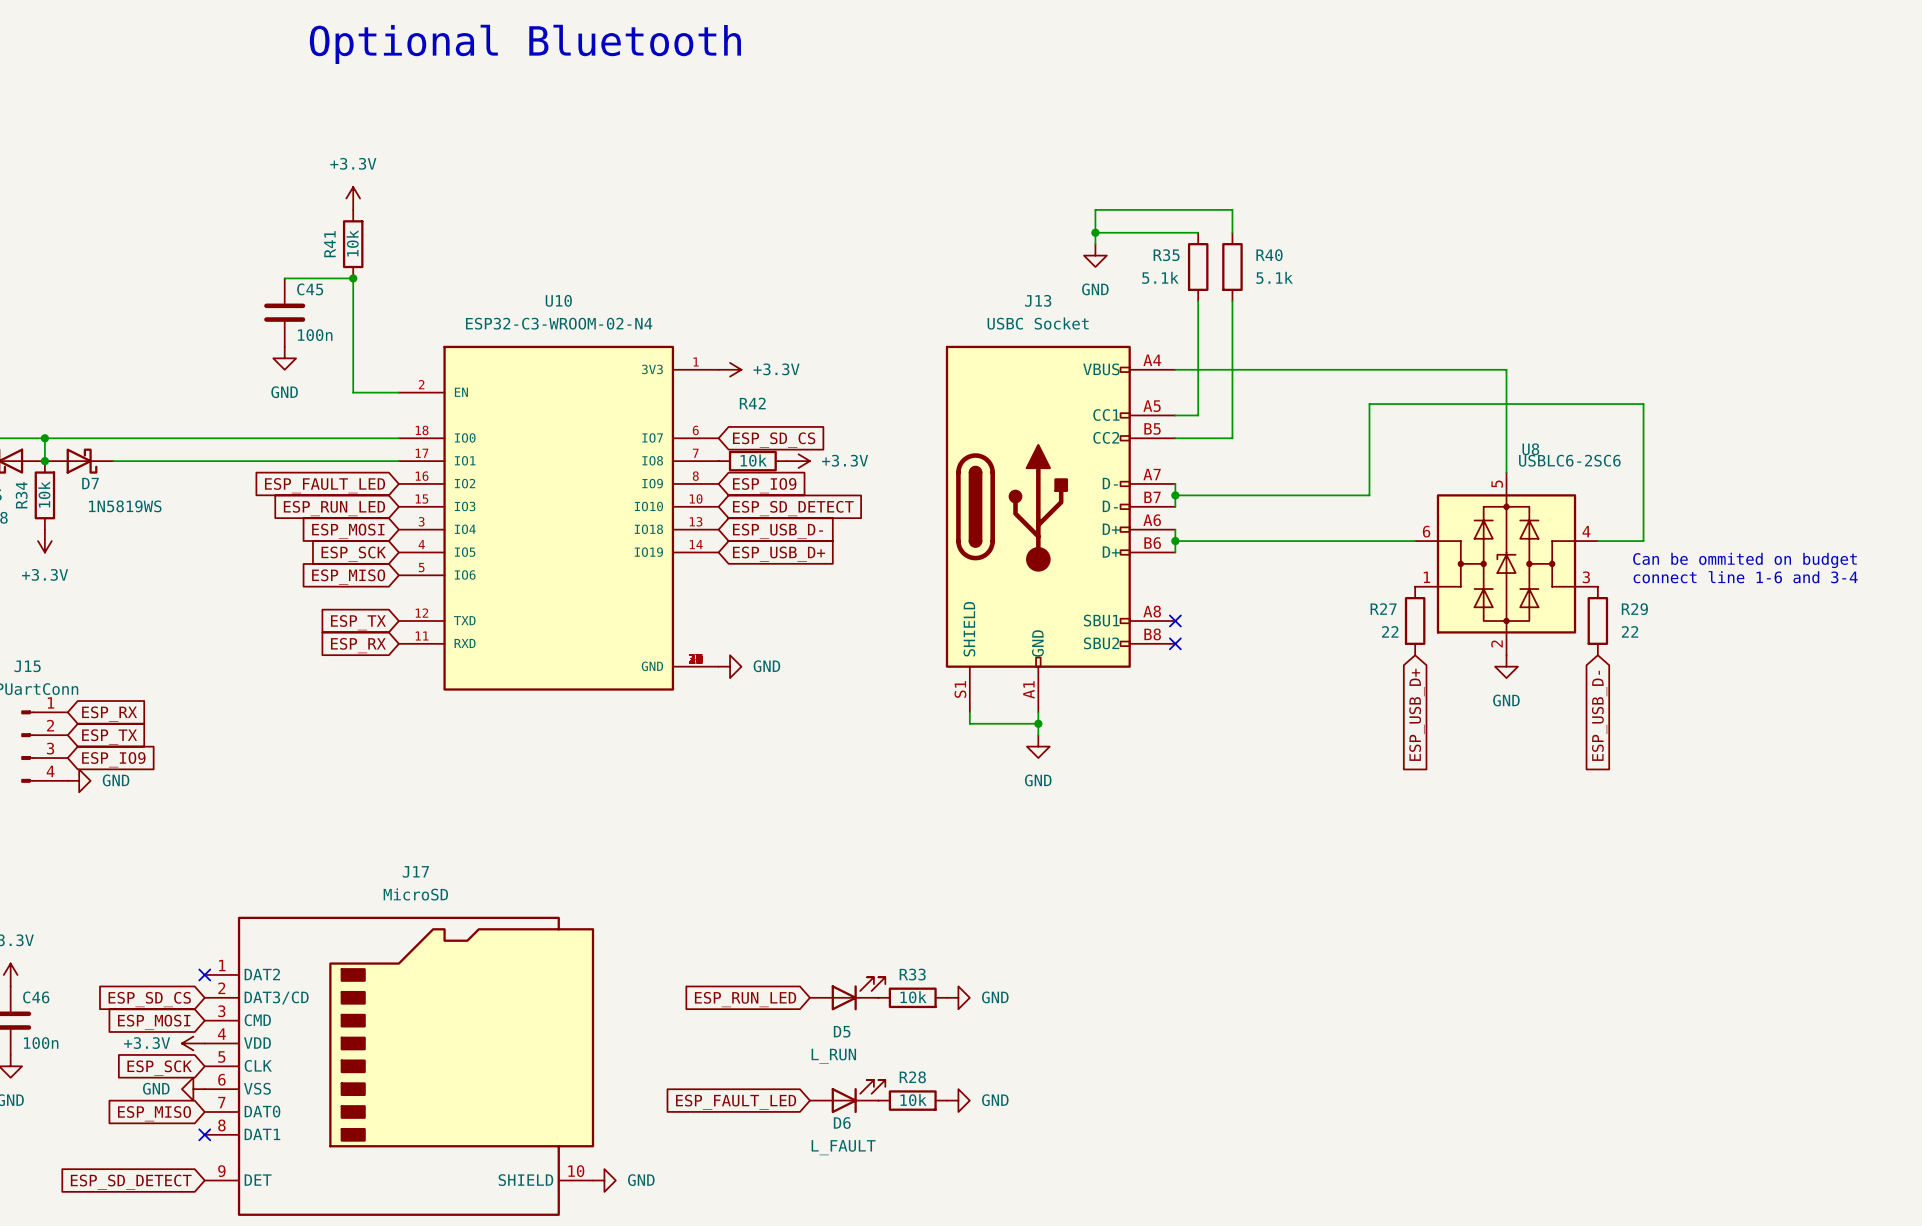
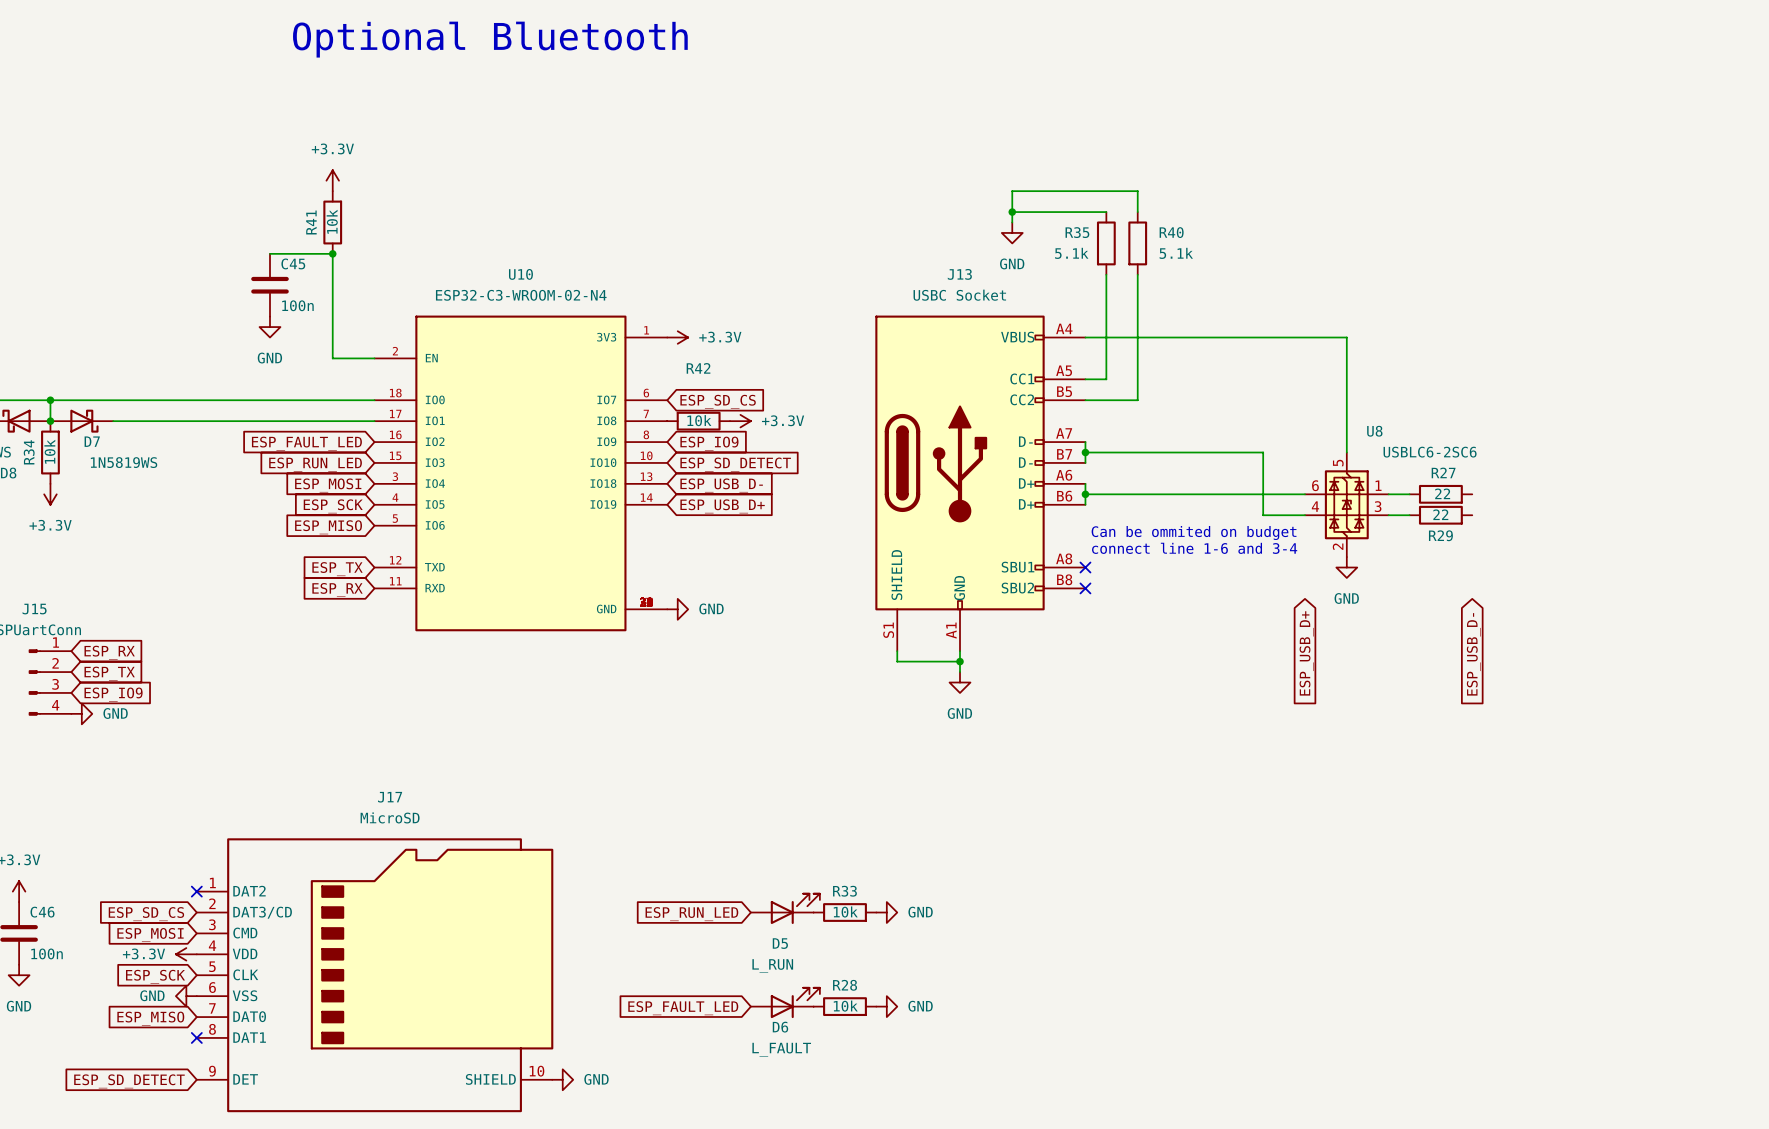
wire: (1460, 369) (1506, 369) (1506, 472) -> (1346, 337) (1346, 452)
U8 name position: U8 (1530, 449) -> U8 (1374, 431)
U8 value position: USBLC6-2SC6 (1569, 460) -> USBLC6-2SC6 (1430, 452)
U8 symbol: [1415, 472, 1598, 656] -> [1304, 452, 1389, 558]
wire: (1369, 495) (1369, 404) (1643, 404) (1643, 541) (1597, 541) -> (1263, 452) (1263, 515) (1304, 515)
text: Can be ommited on budget (1745, 560) -> none
text: connect line 1-6 and 3-4 (1745, 577) -> none
text: none -> Can be ommited on budget (1194, 532)
text: none -> connect line 1-6 and 3-4 (1194, 548)
R29 name position: R29 (1634, 609) -> R29 (1440, 535)
R27 rotation: 0° (1415, 620) -> 90° clockwise (1440, 494)
R27 position: (1415, 620) -> (1440, 494)
R29 rotation: 0° (1597, 620) -> 90° clockwise (1440, 515)
R29 position: (1597, 620) -> (1440, 515)
R27 value position: 22 (1390, 631) -> 22 (1442, 493)
R29 value position: 22 (1630, 631) -> 22 (1440, 514)
power symbol position: GND (1506, 666) -> GND (1346, 567)

